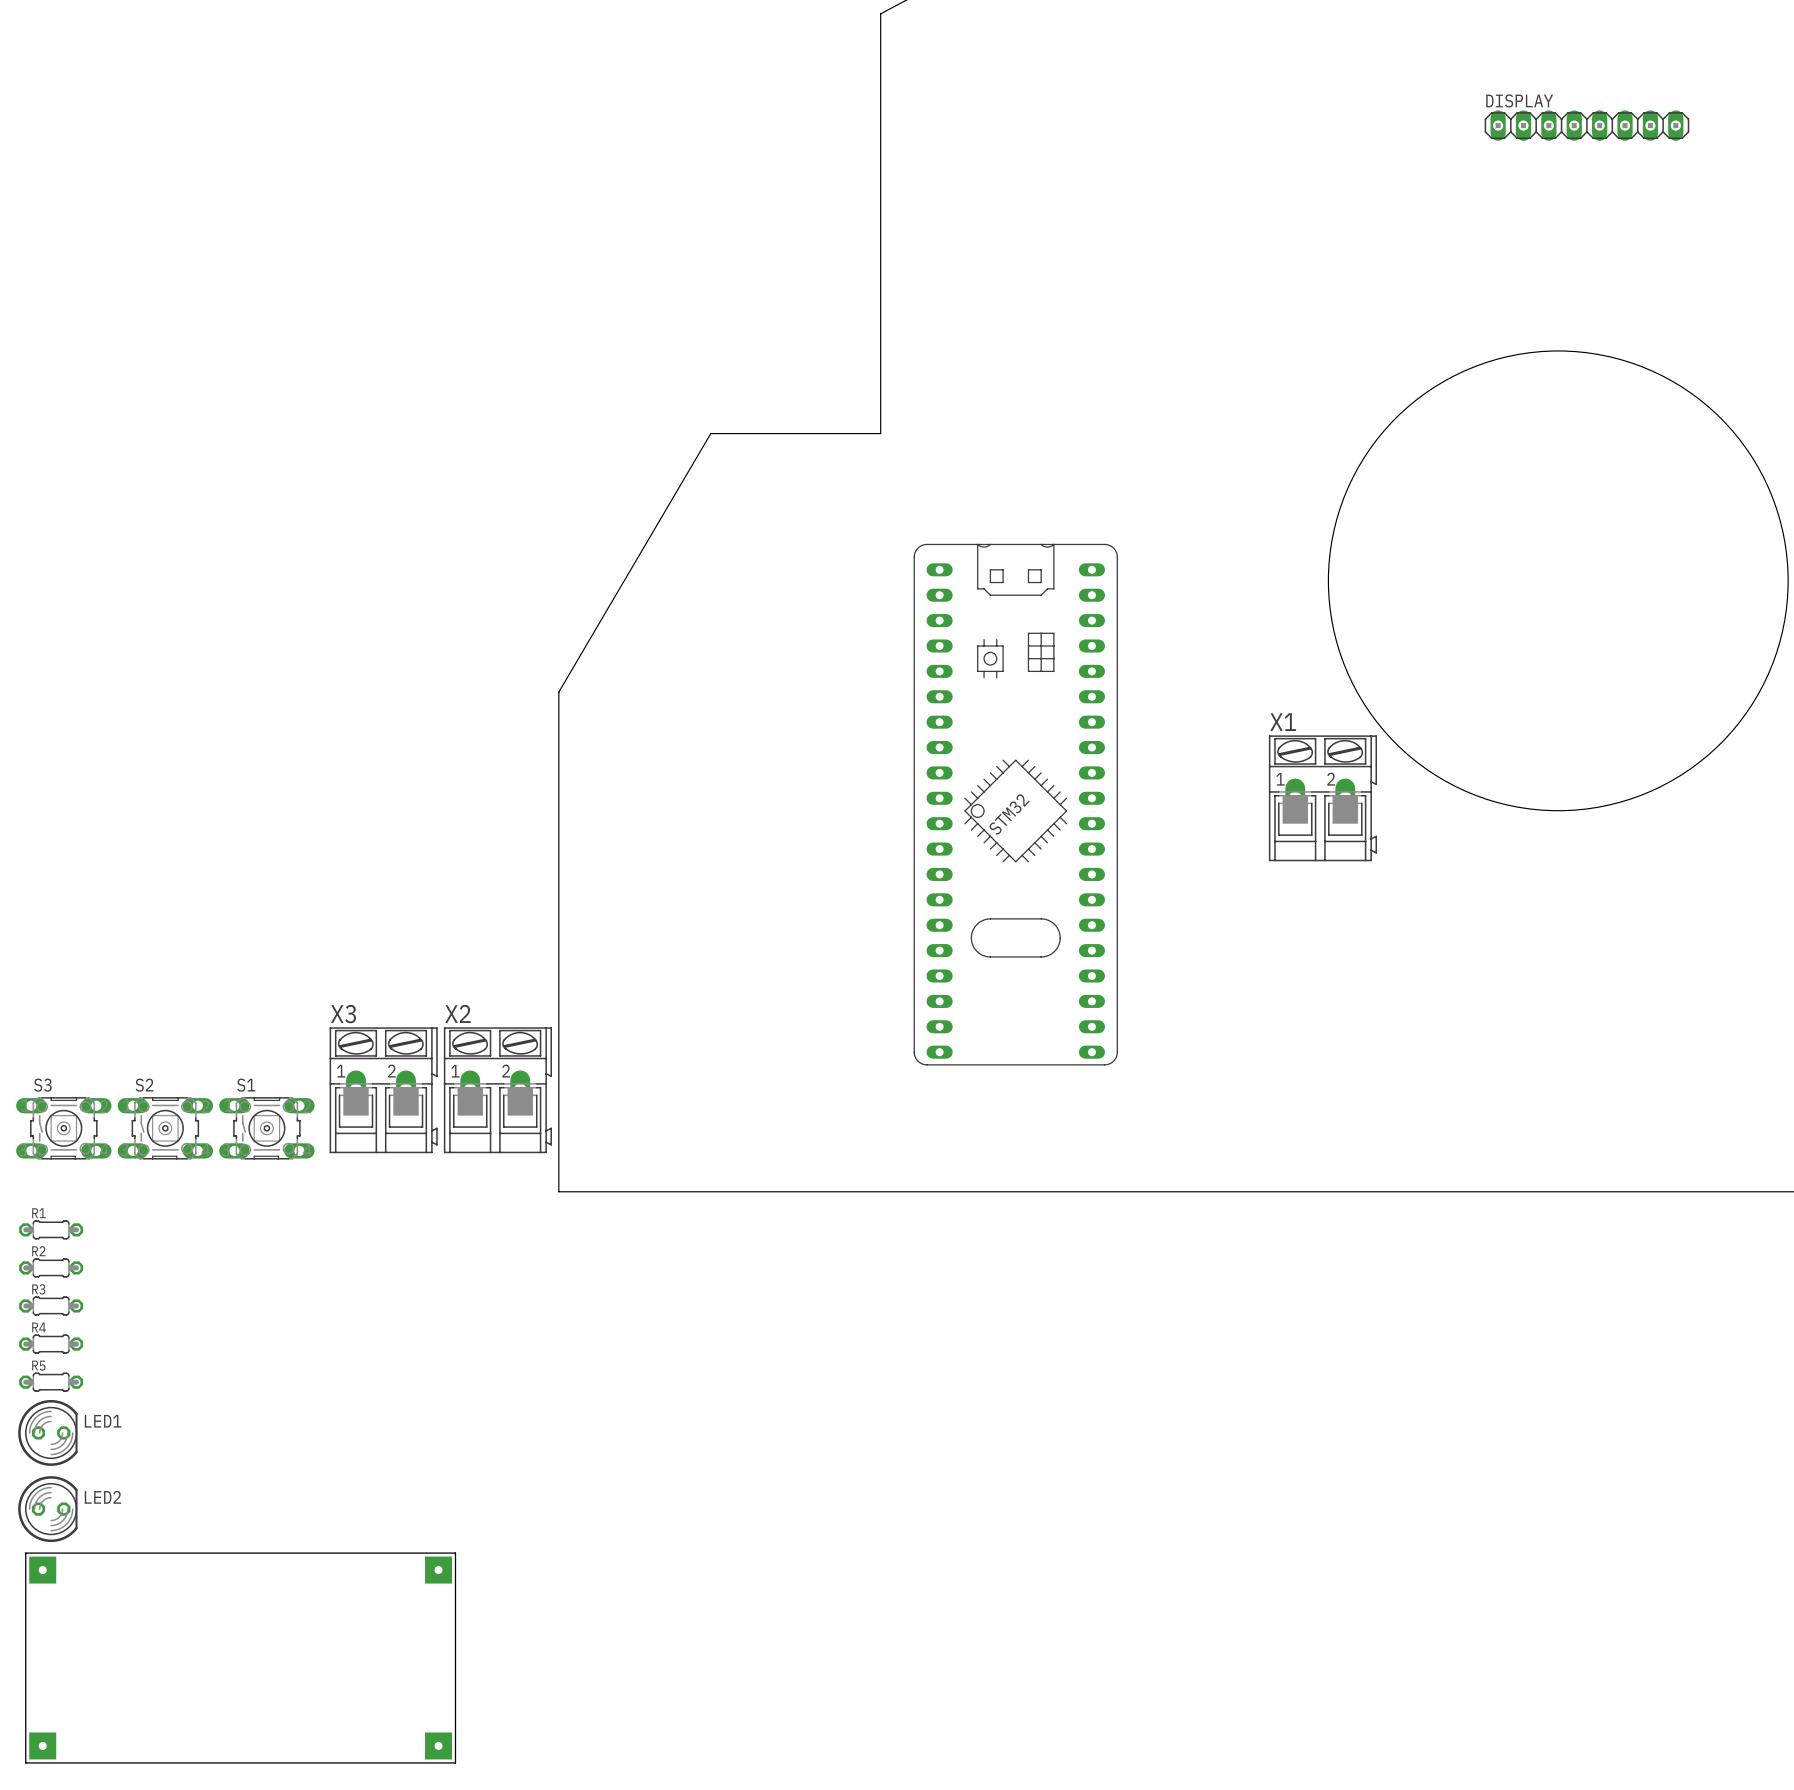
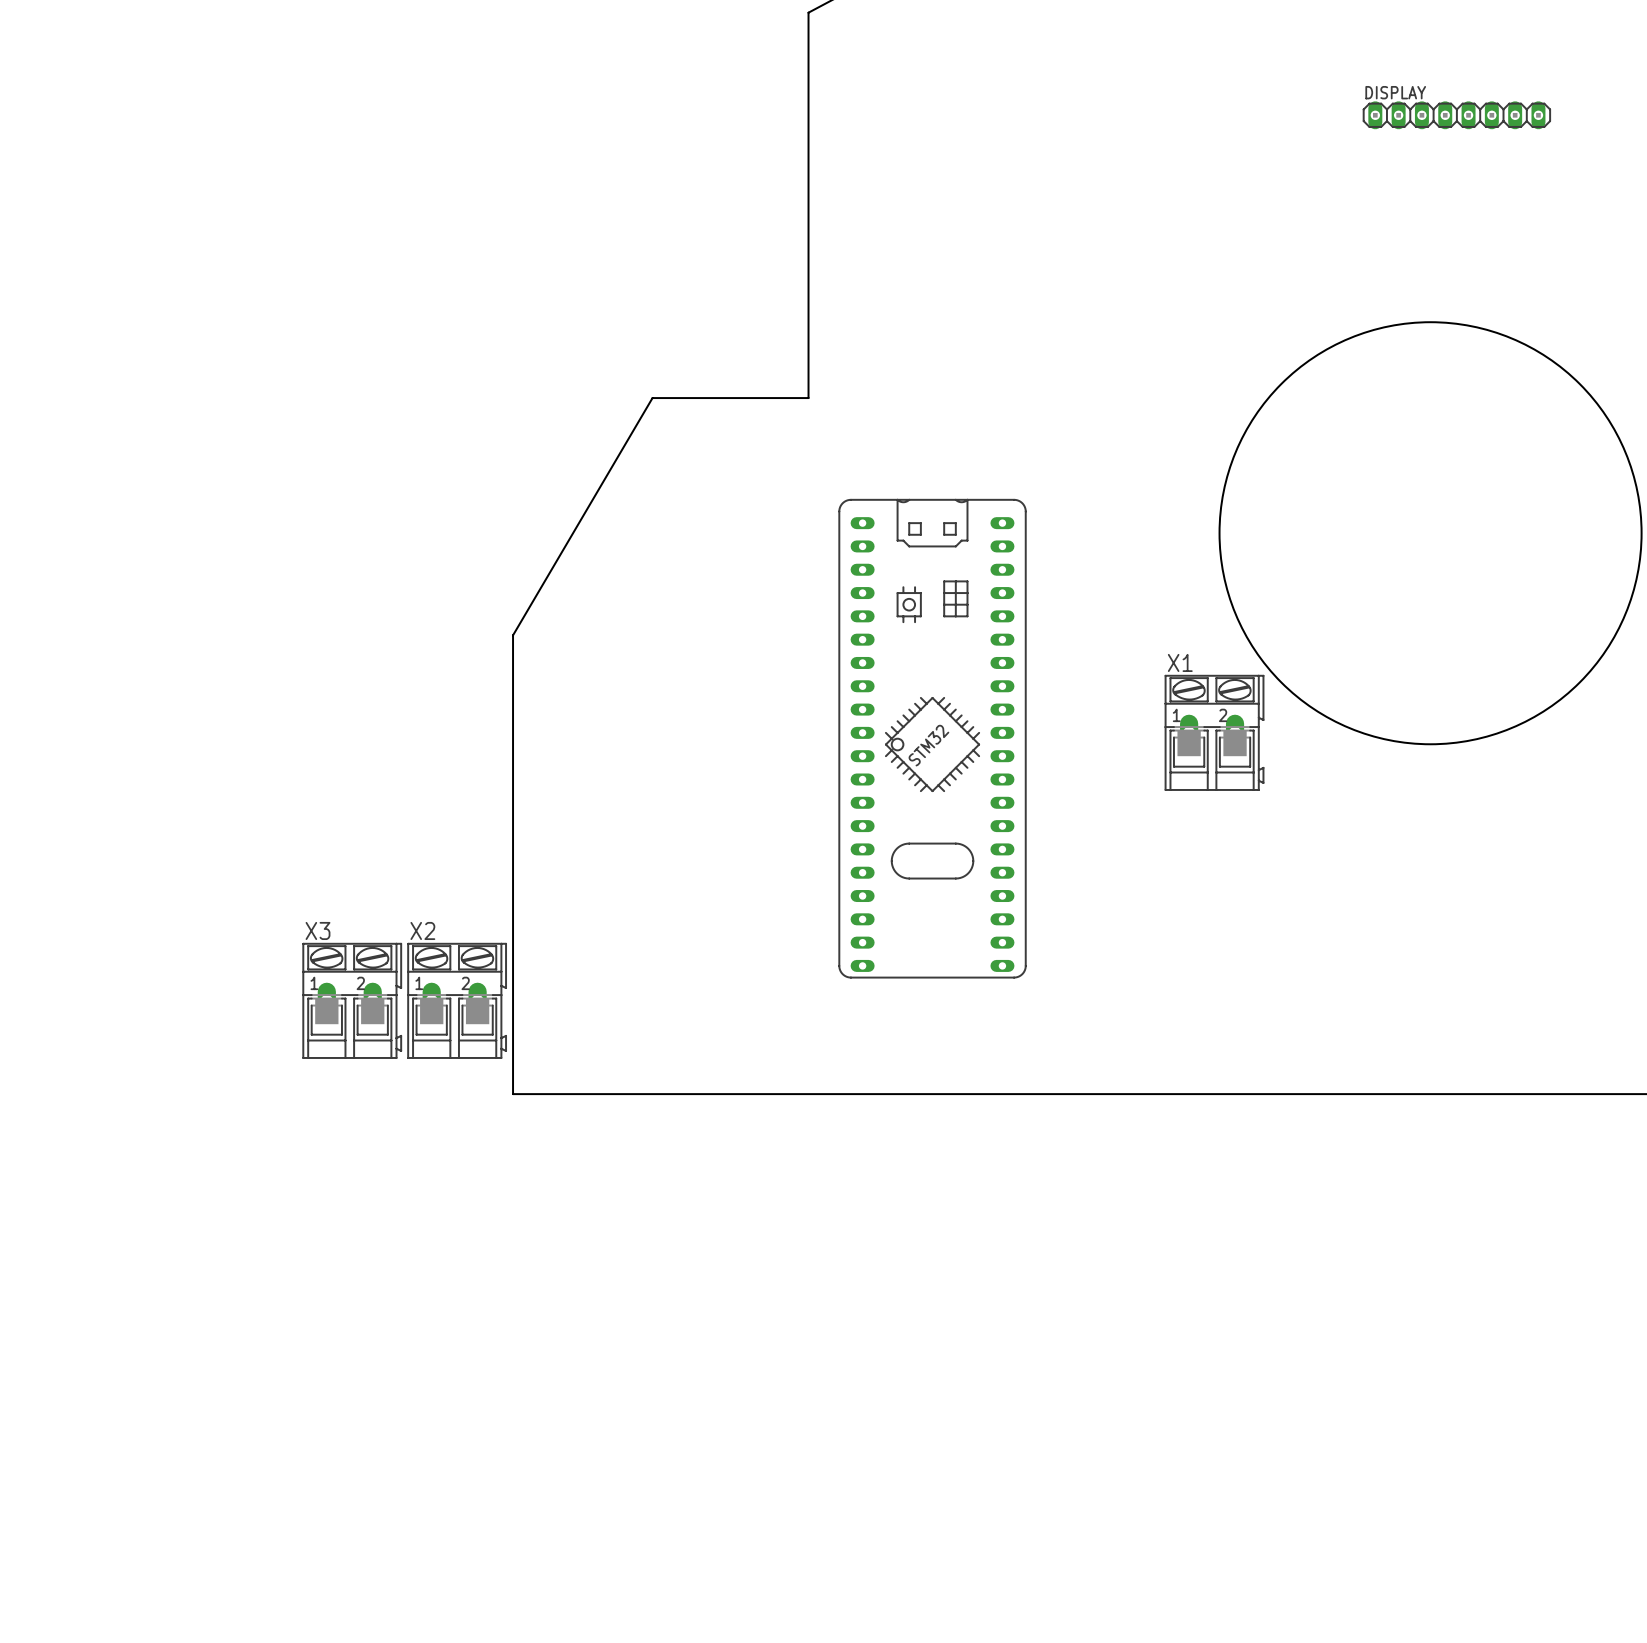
S3: (63, 1128) -> none
S2: (165, 1128) -> none
S1: (266, 1128) -> none
R1: (51, 1229) -> none
R2: (51, 1267) -> none
R3: (51, 1306) -> none
R4: (51, 1344) -> none
R5: (51, 1382) -> none
LED1: (47, 1432) -> none
LED2: (47, 1509) -> none
part: (240, 1658) -> none

